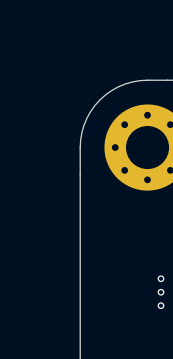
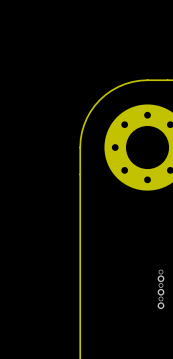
via: none -> (160, 272)
via: none -> (160, 285)
via: none -> (160, 298)

